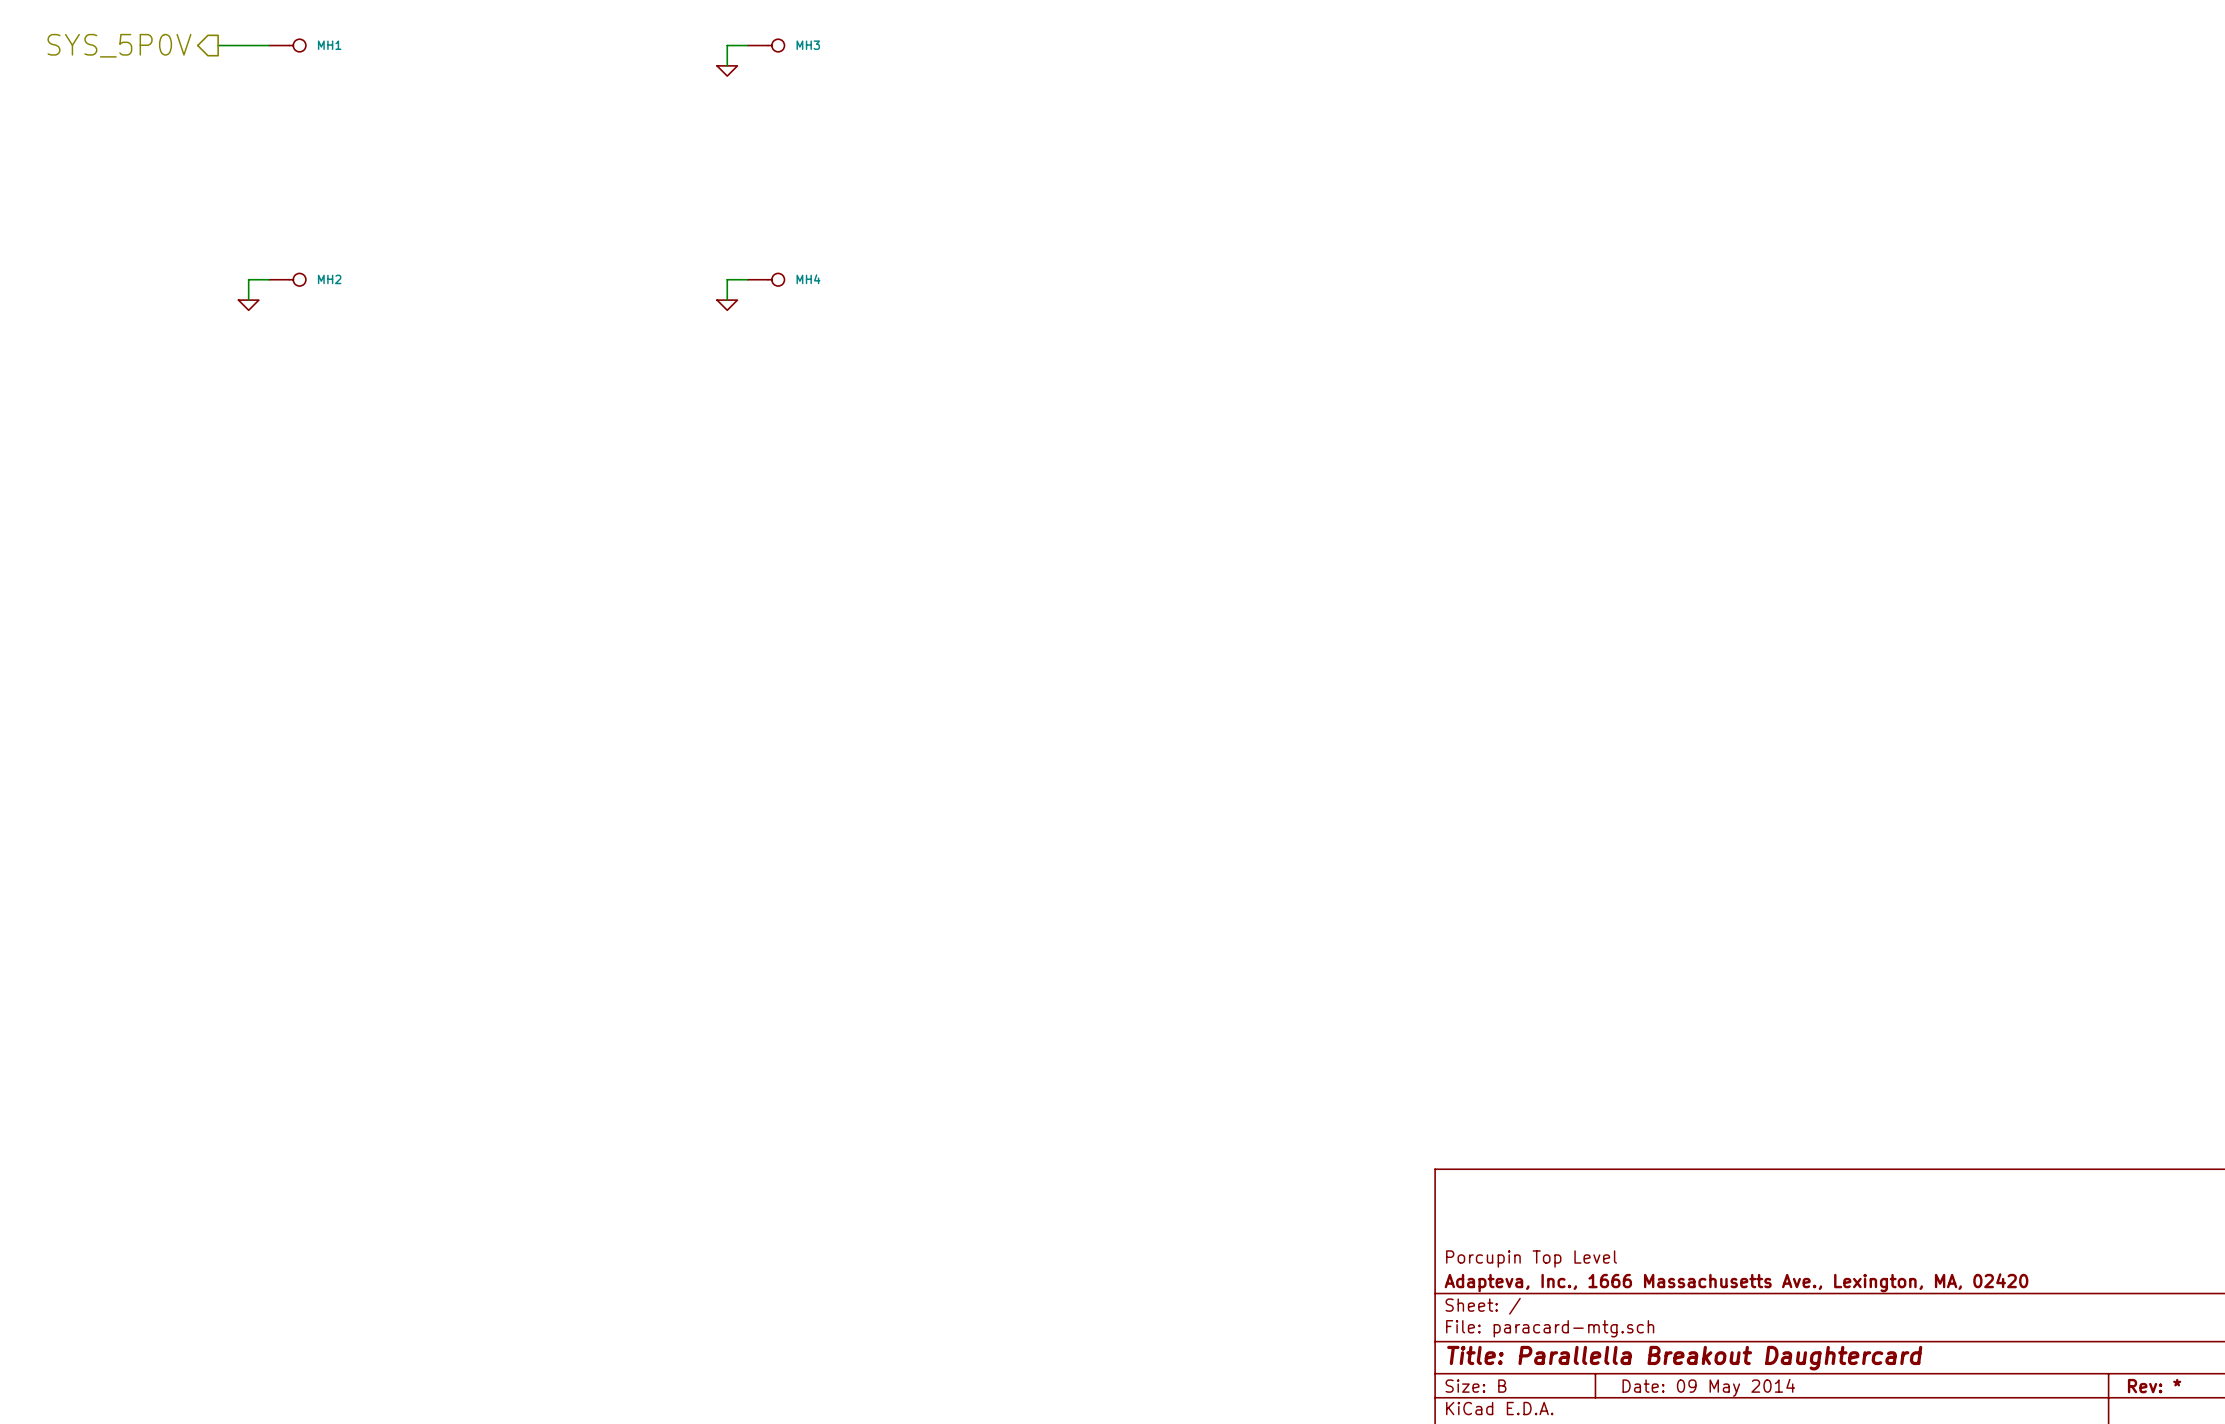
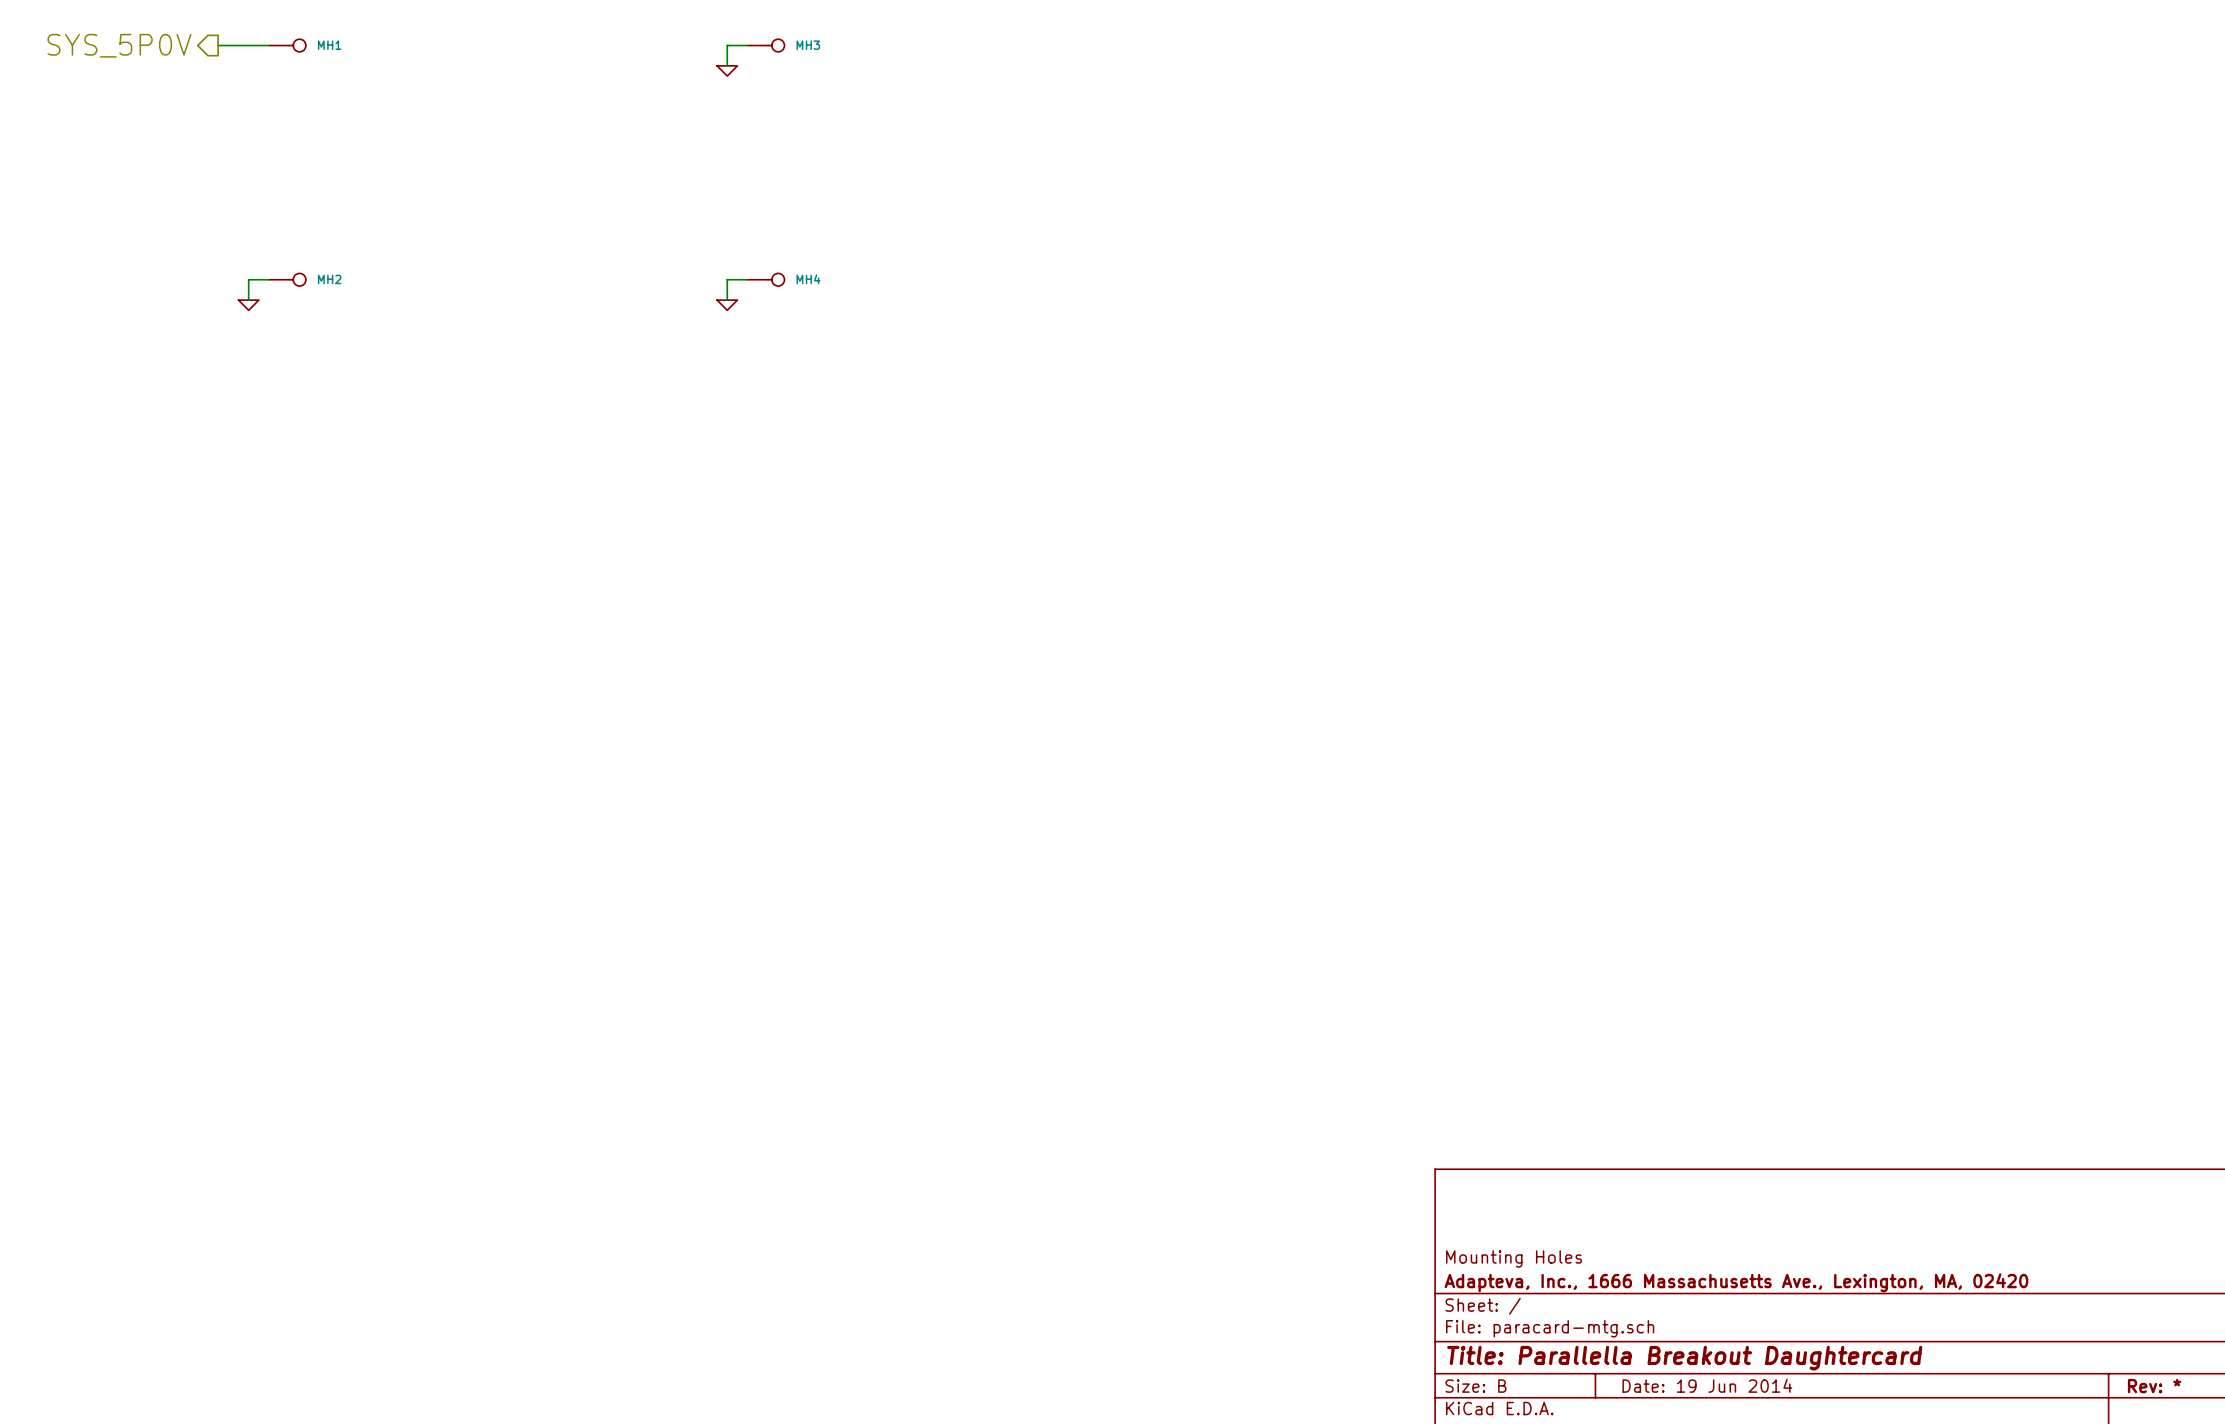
title block: Porcupin Top Level (1531, 1259) -> Mounting Holes (1514, 1259)
title block: Date: 09 May 2014 (1708, 1387) -> Date: 19 Jun 2014 (1707, 1385)

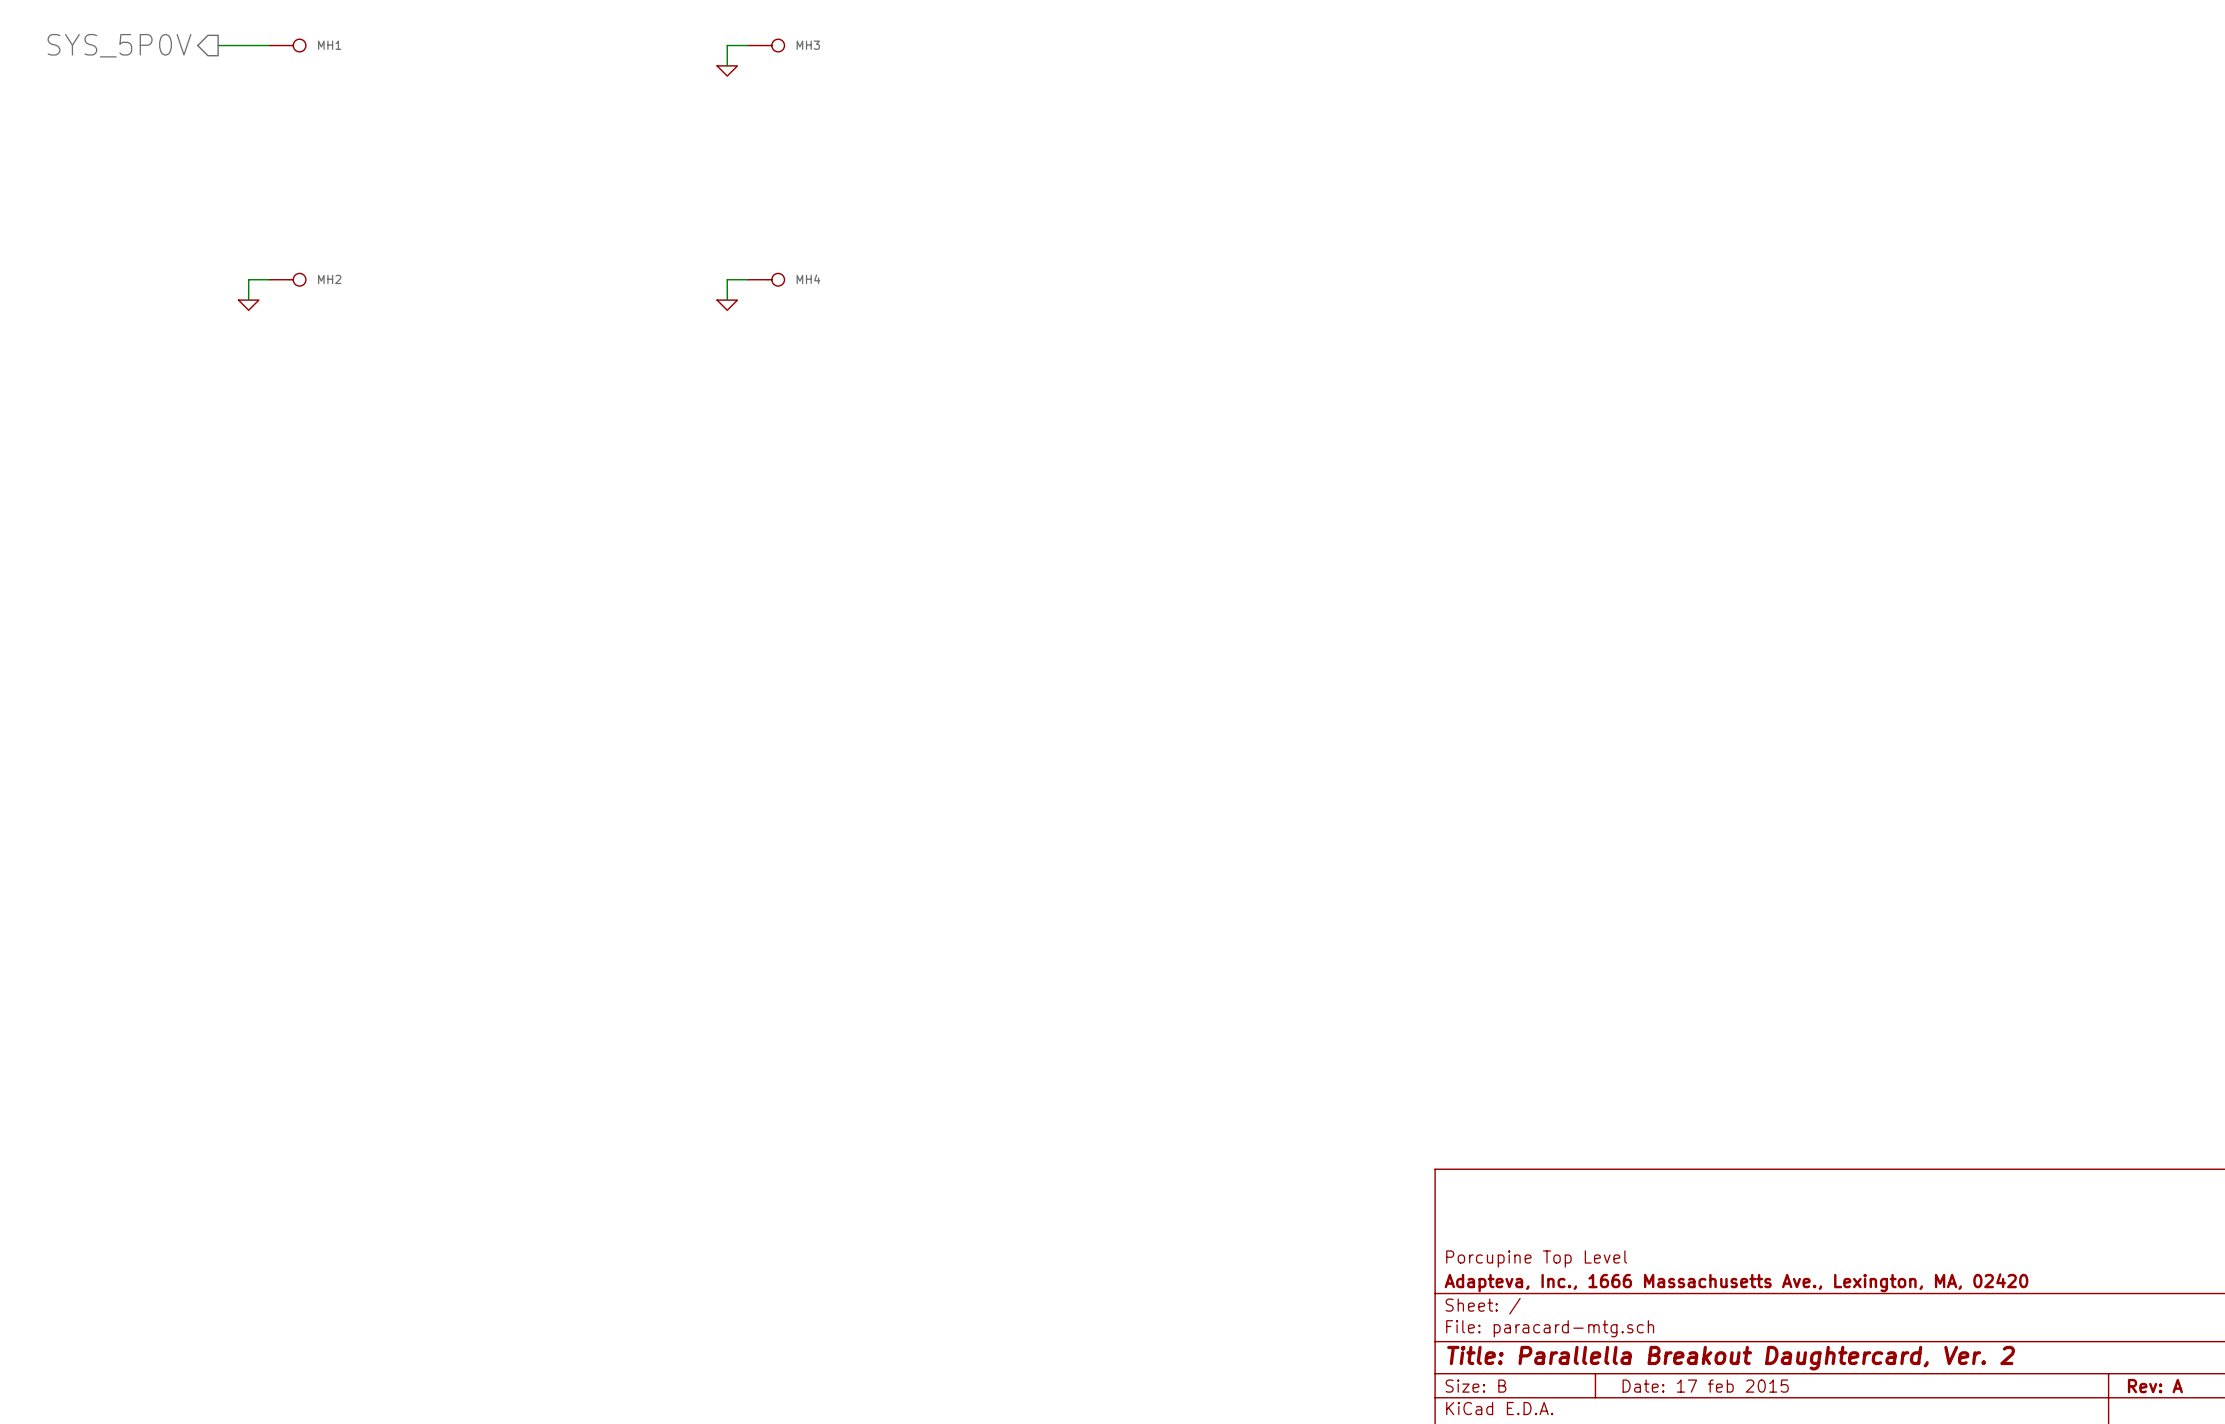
title block: Mounting Holes (1514, 1259) -> Porcupine Top Level (1536, 1259)
title block: Title: Parallella Breakout Daughtercard (1684, 1358) -> Title: Parallella Breakout Daughtercard, Ver. 2 (1731, 1358)
title block: Date: 19 Jun 2014 (1707, 1385) -> Date: 17 feb 2015 (1705, 1386)
title block: Rev: * (2154, 1386) -> Rev: A (2155, 1386)

